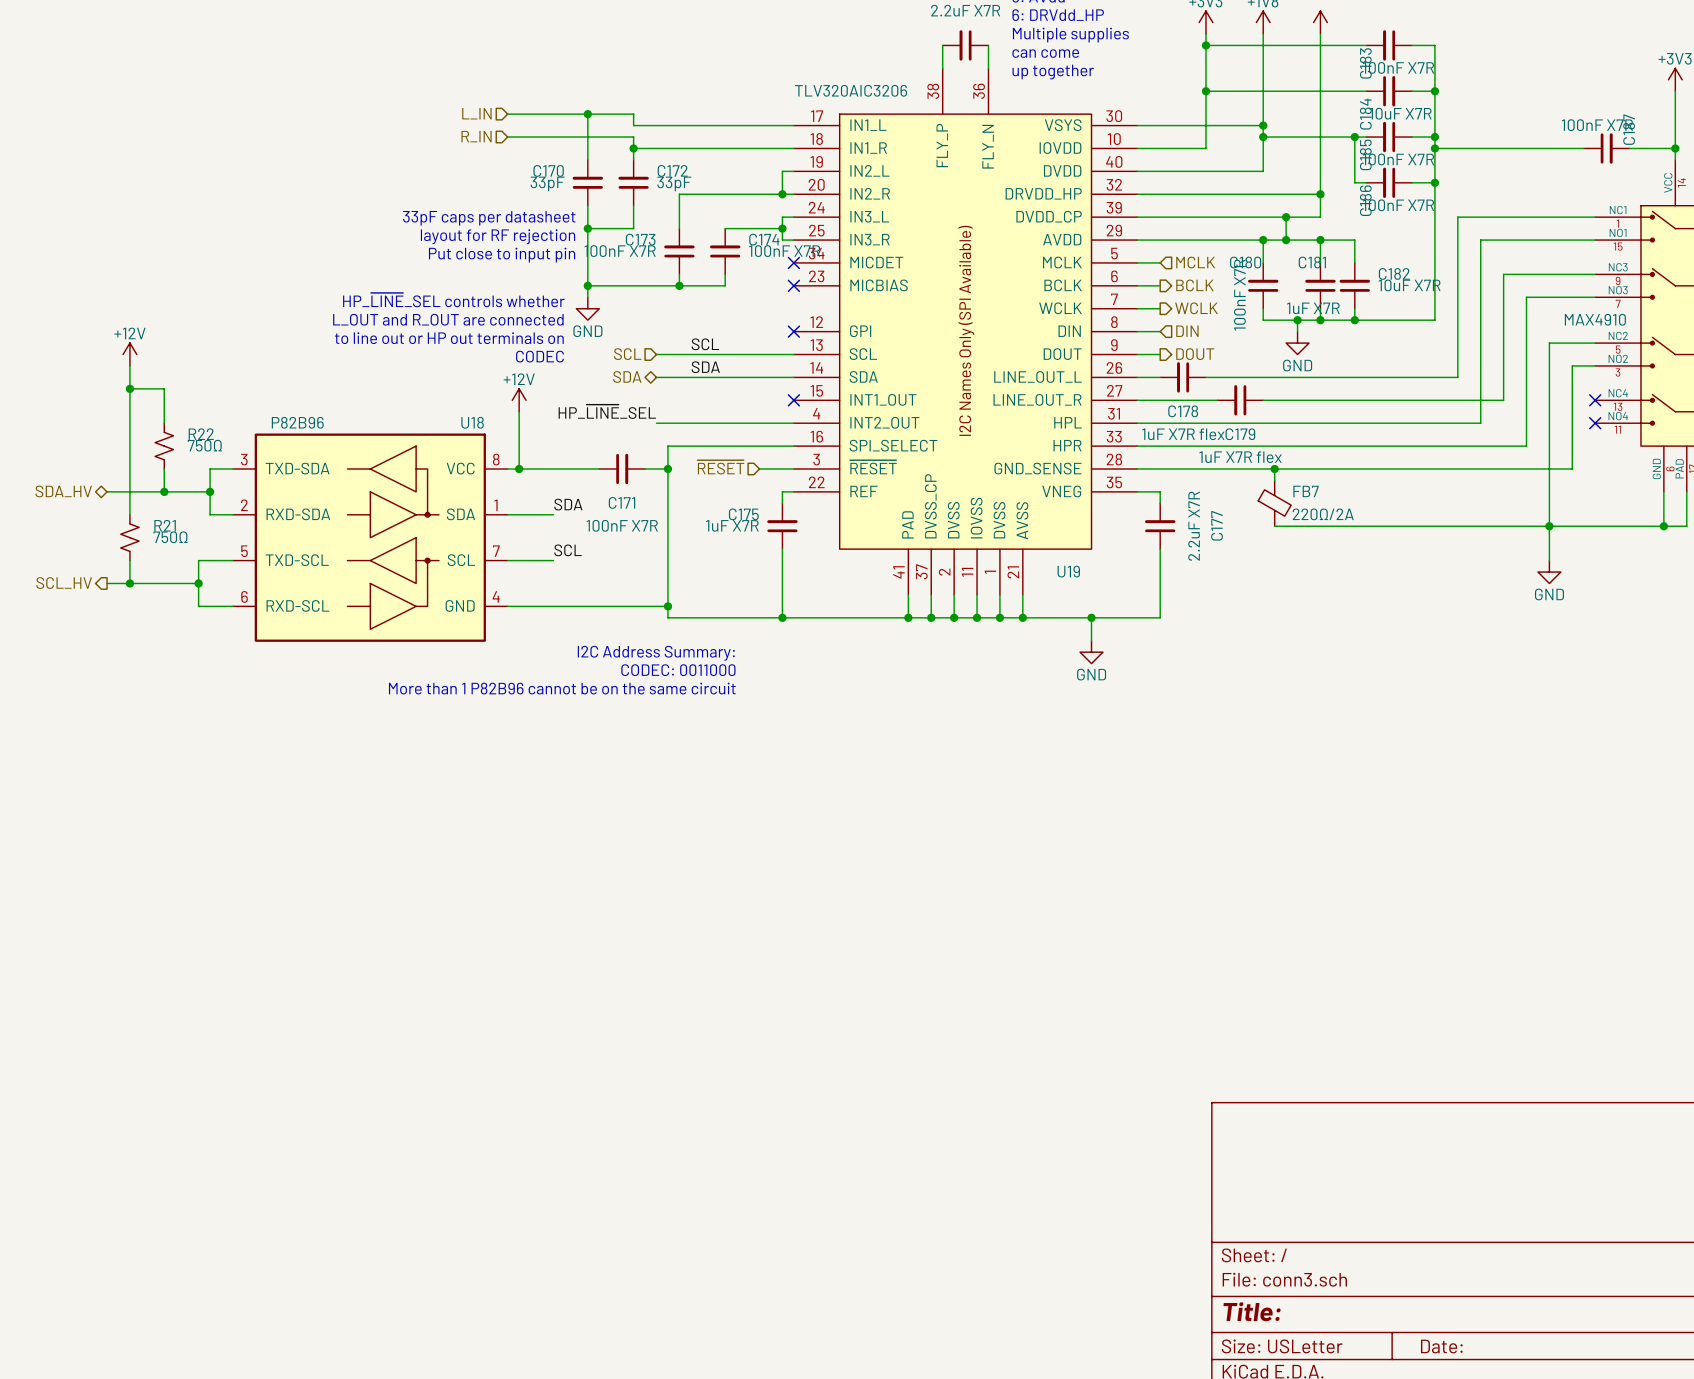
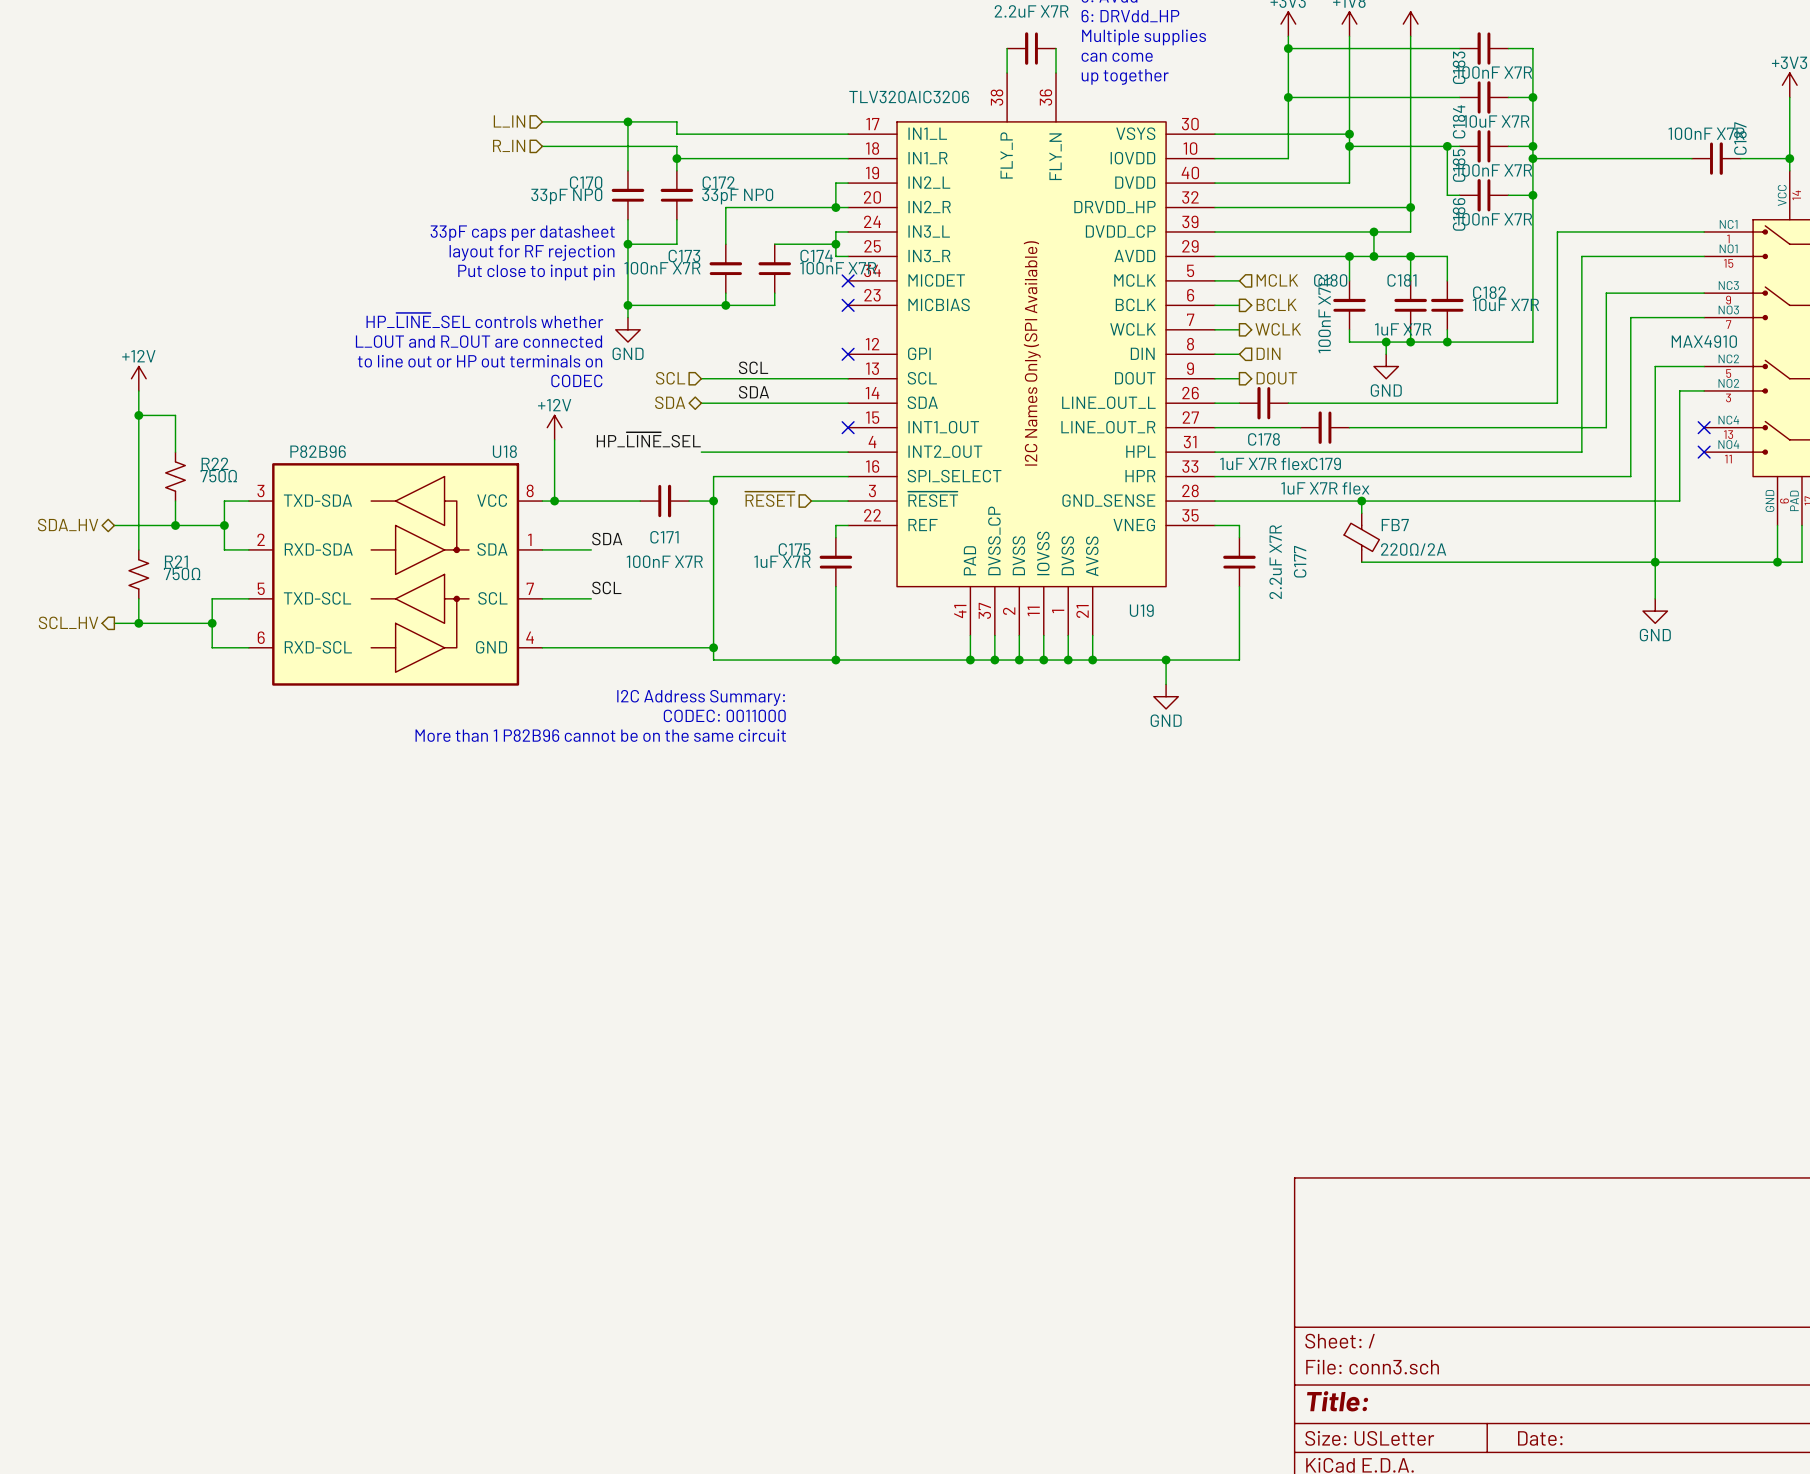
C170 value: 33pF (547, 183) -> 33pF NP0 (566, 196)
C172 value: 33pF (674, 183) -> 33pF NP0 (737, 196)

